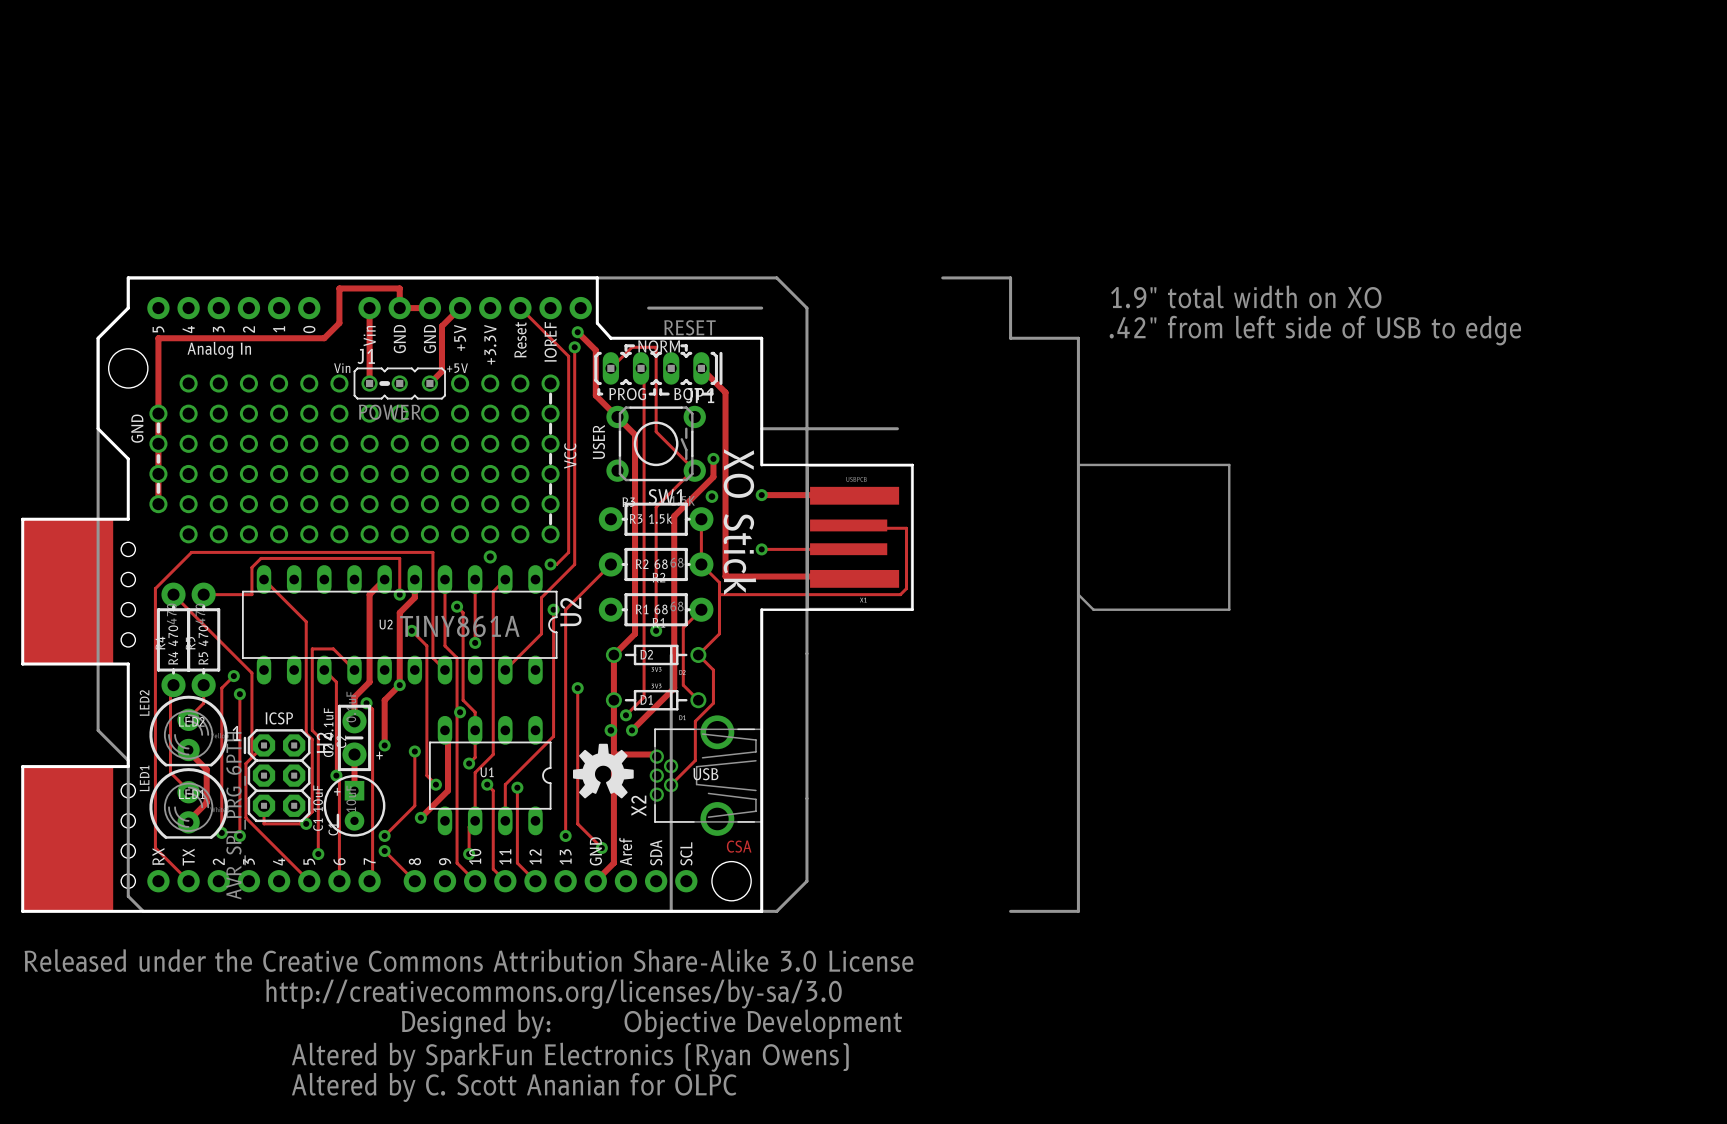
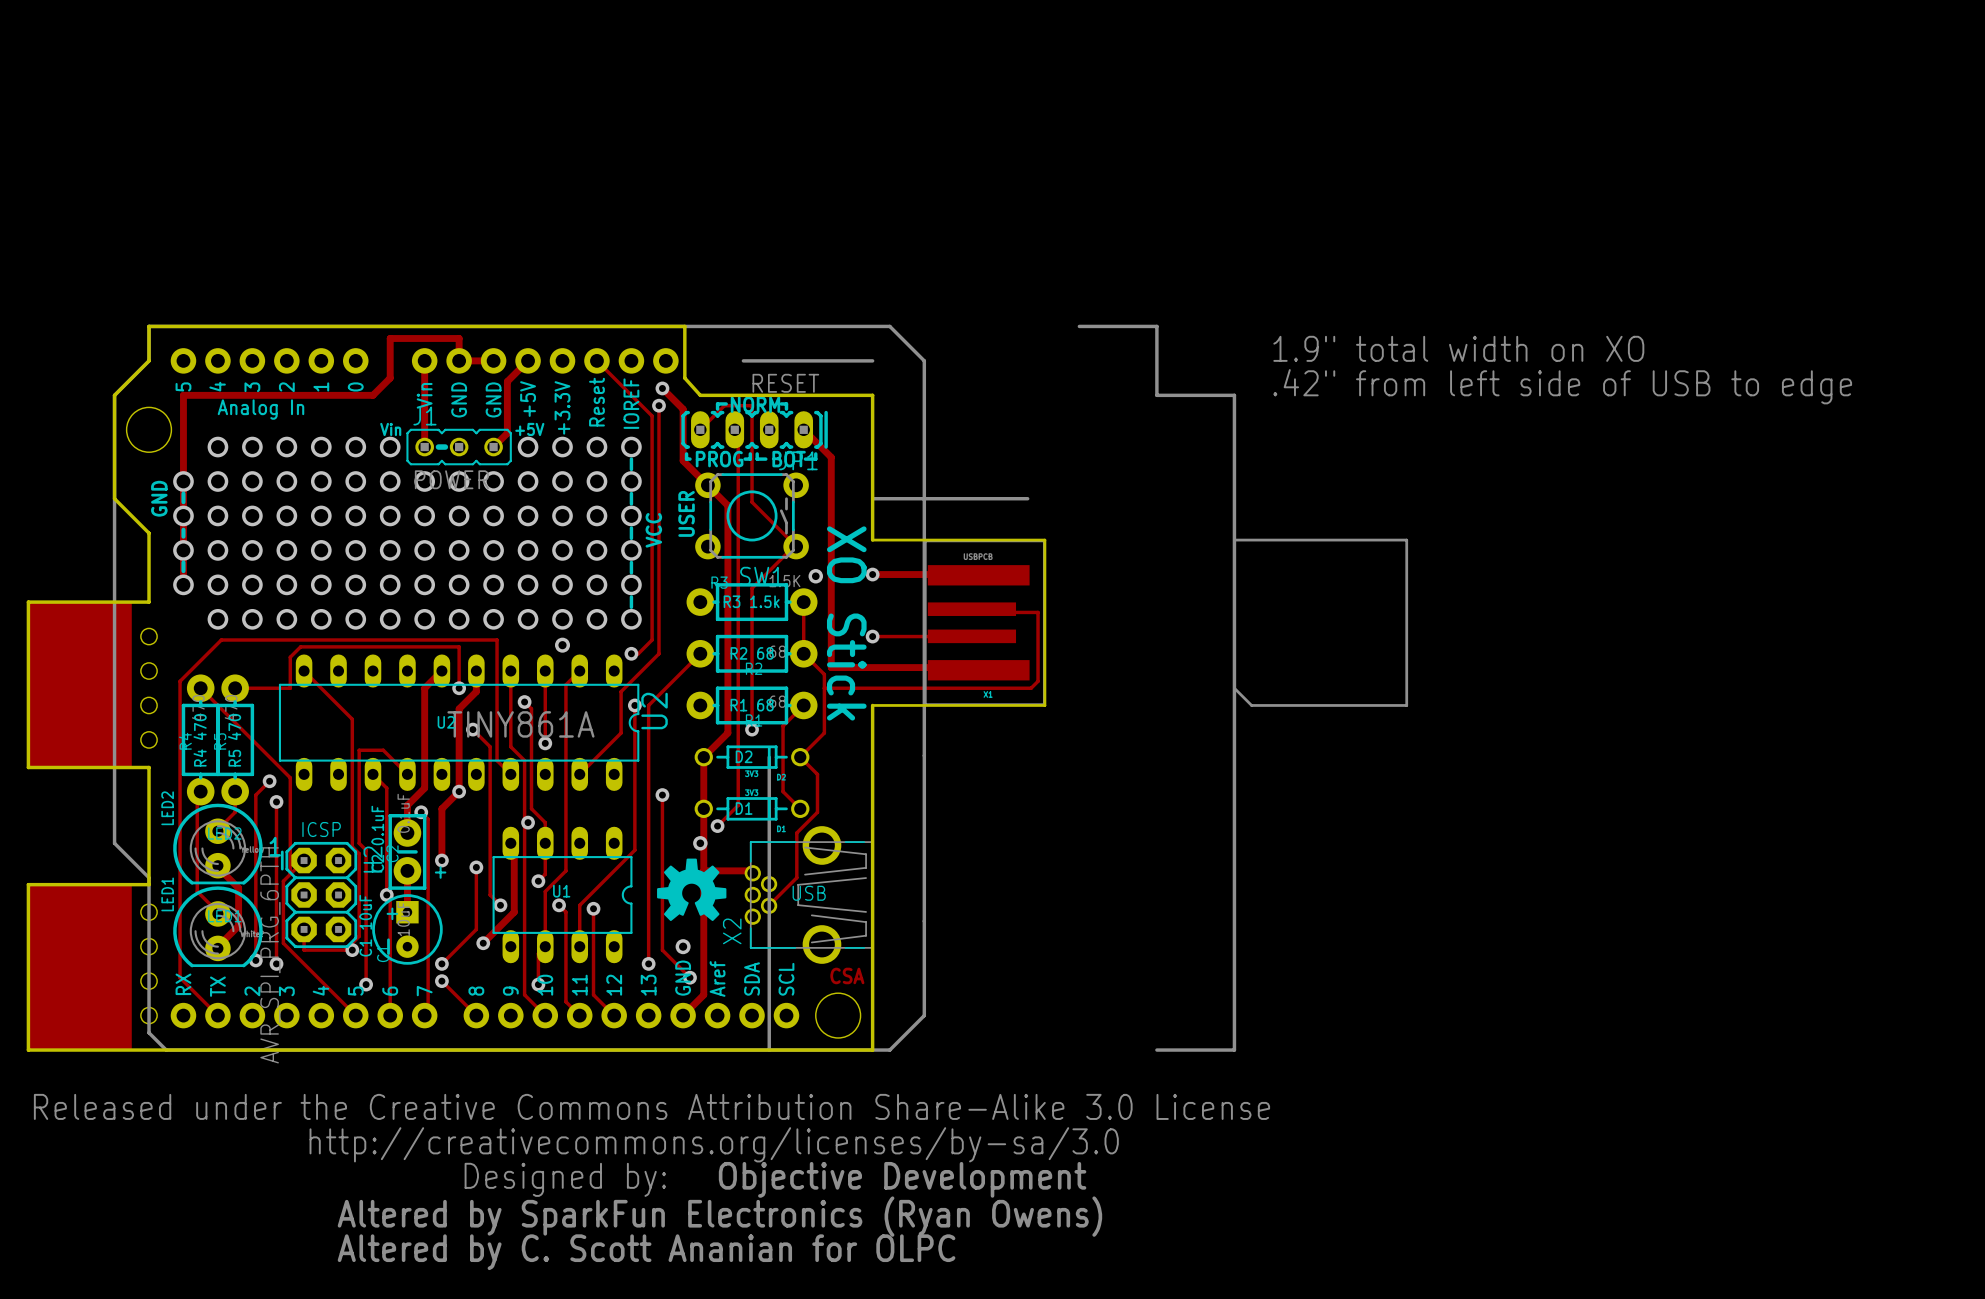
track: (713, 458) (713, 477) (674, 516) (674, 688) (632, 730) -> none
via: (713, 458) -> none
via: (632, 730) -> none
via: none -> (683, 946)

